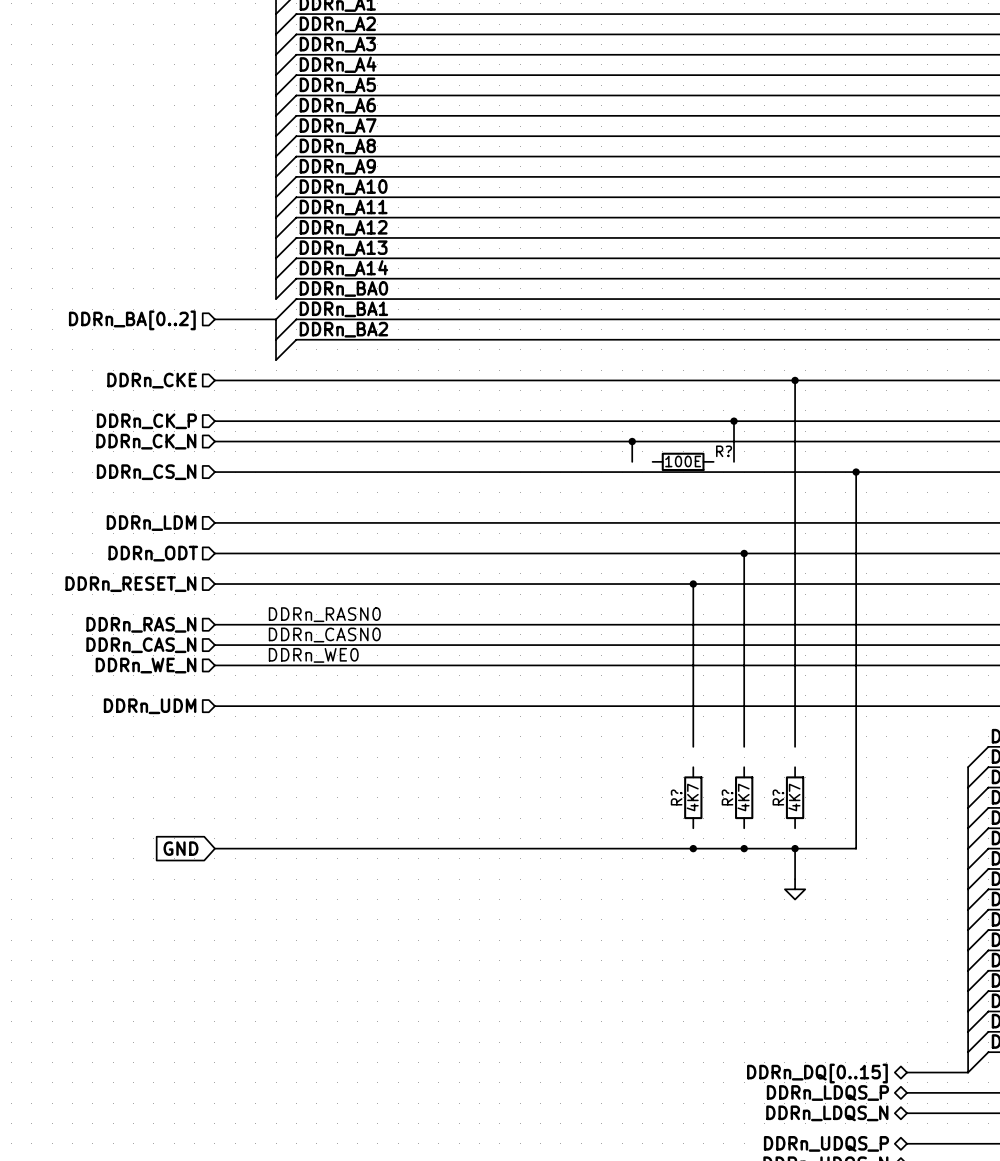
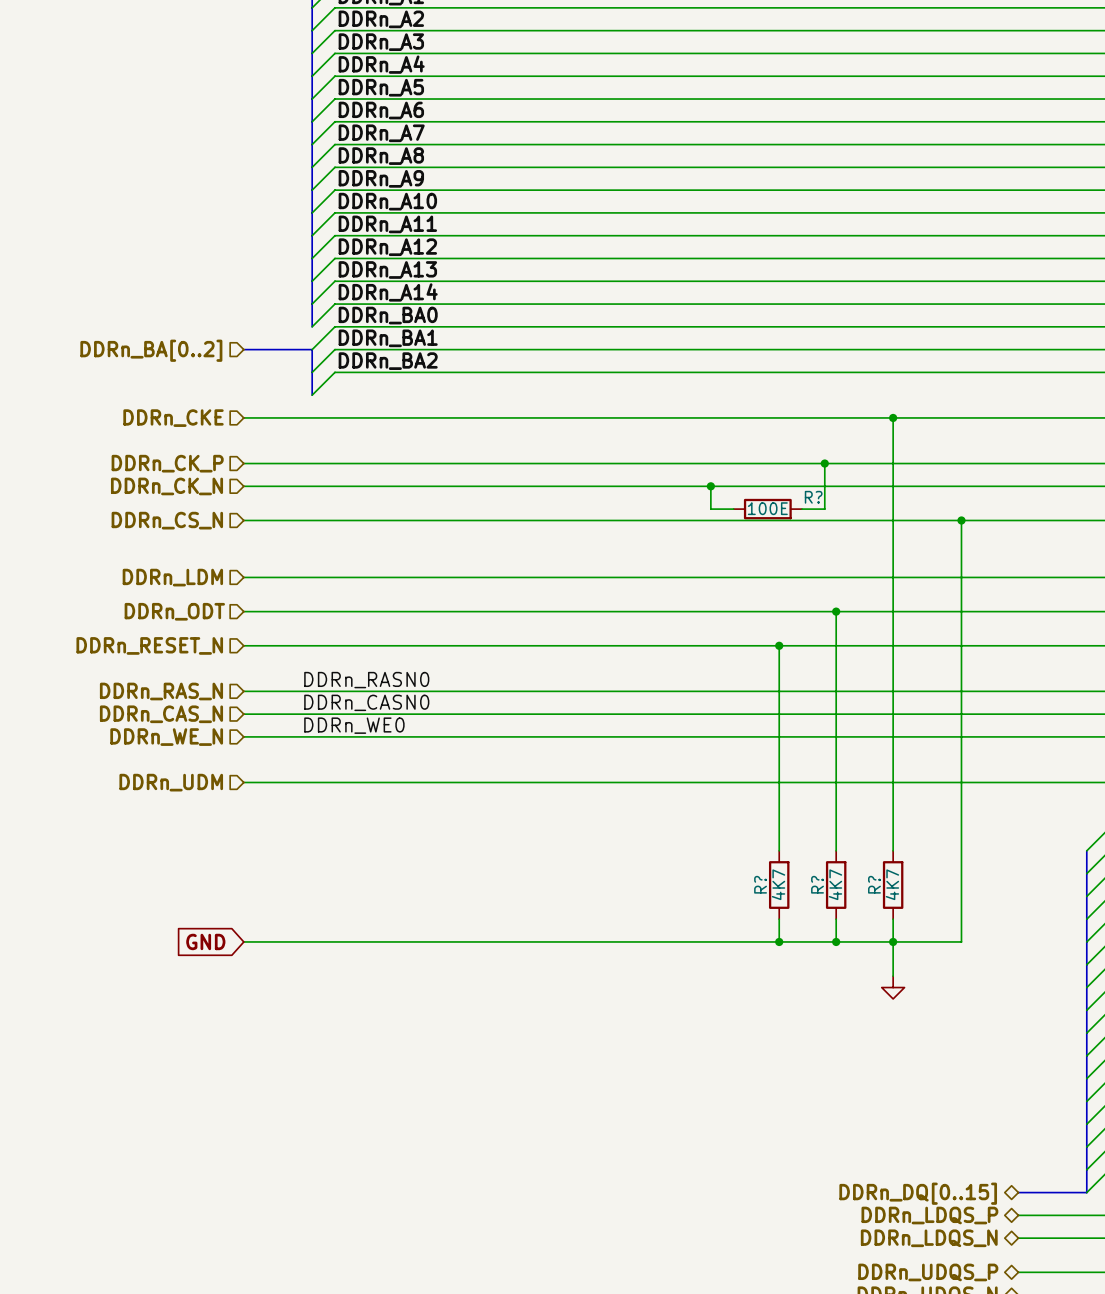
wire: none -> (710, 509) (733, 509)
wire: none -> (802, 509) (824, 509)
wire: none -> (779, 828) (779, 850)
wire: none -> (836, 828) (836, 850)
wire: none -> (893, 828) (893, 850)
wire: none -> (779, 919) (779, 941)
wire: none -> (836, 919) (836, 941)
wire: none -> (893, 919) (893, 941)

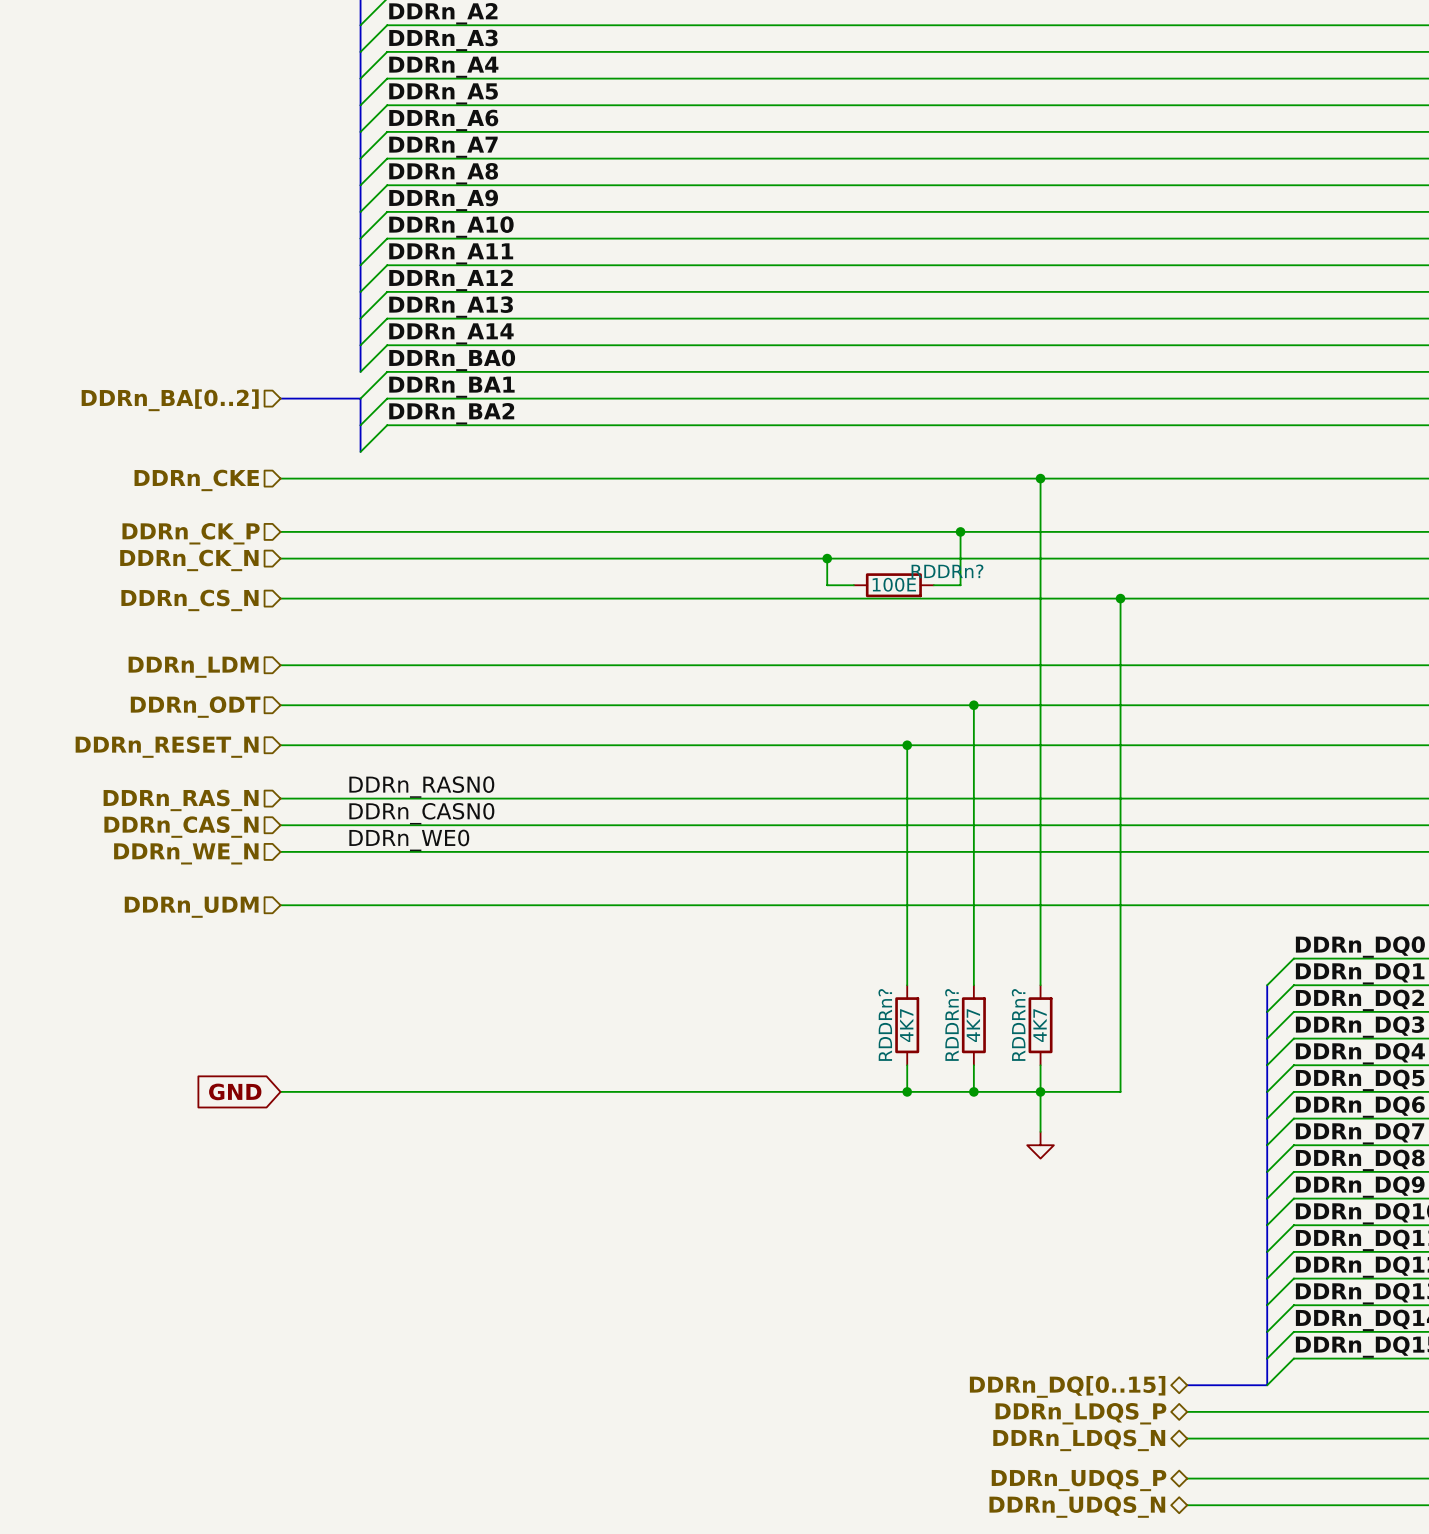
R? name: R? (813, 497) -> RDDRn? (947, 571)
R? name: R? (760, 884) -> RDDRn? (885, 1024)
R? name: R? (817, 884) -> RDDRn? (951, 1024)
R? name: R? (874, 884) -> RDDRn? (1018, 1024)

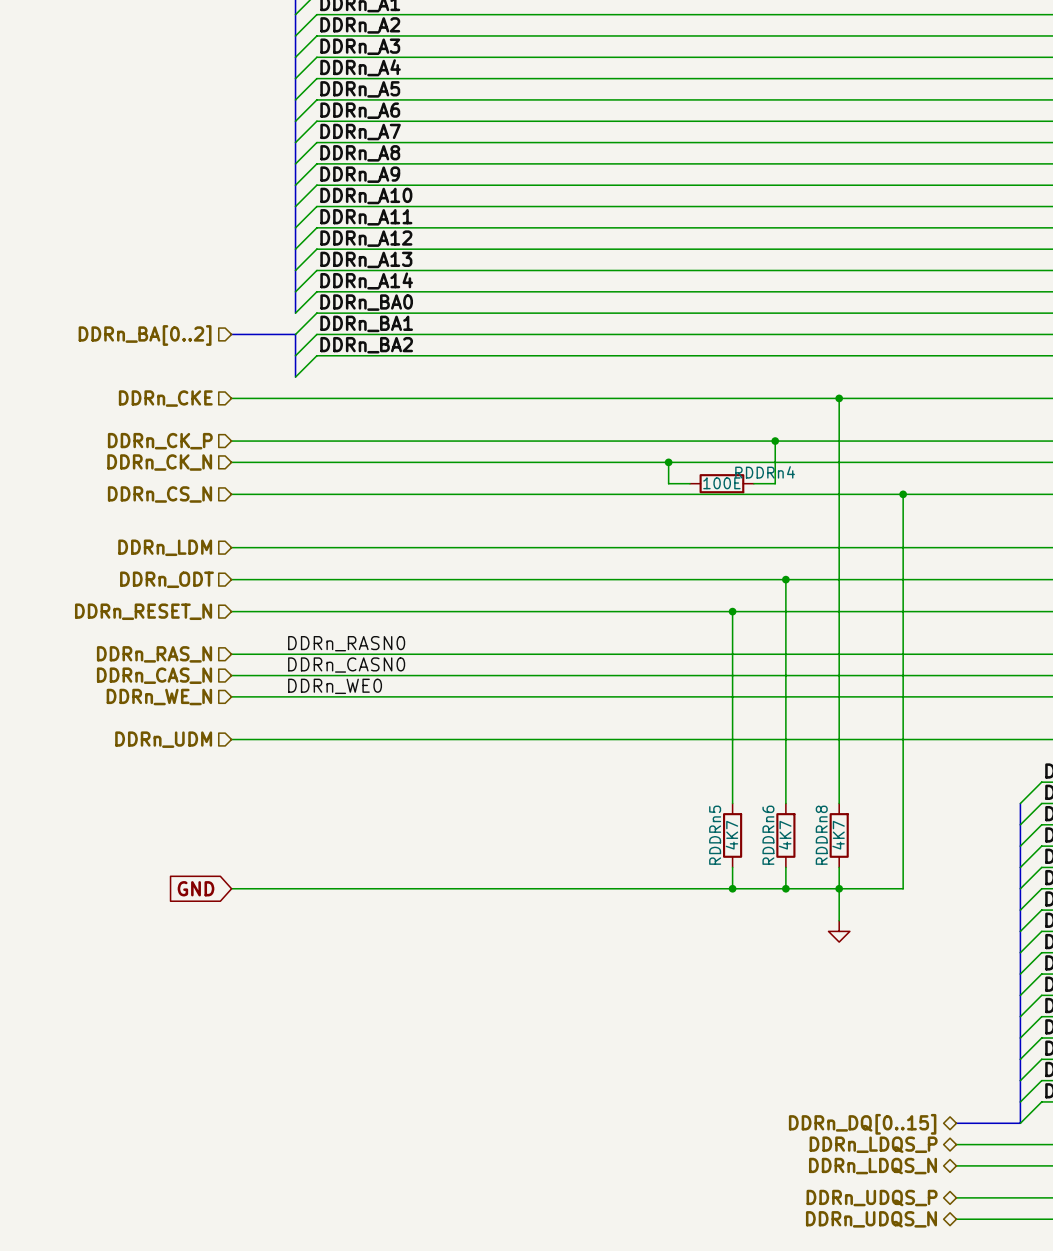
RDDRn? name: RDDRn? (947, 571) -> RDDRn4 (765, 472)
RDDRn? name: RDDRn? (885, 1024) -> RDDRn5 (715, 835)
RDDRn? name: RDDRn? (951, 1024) -> RDDRn6 (768, 835)
RDDRn? name: RDDRn? (1018, 1024) -> RDDRn8 (821, 835)

